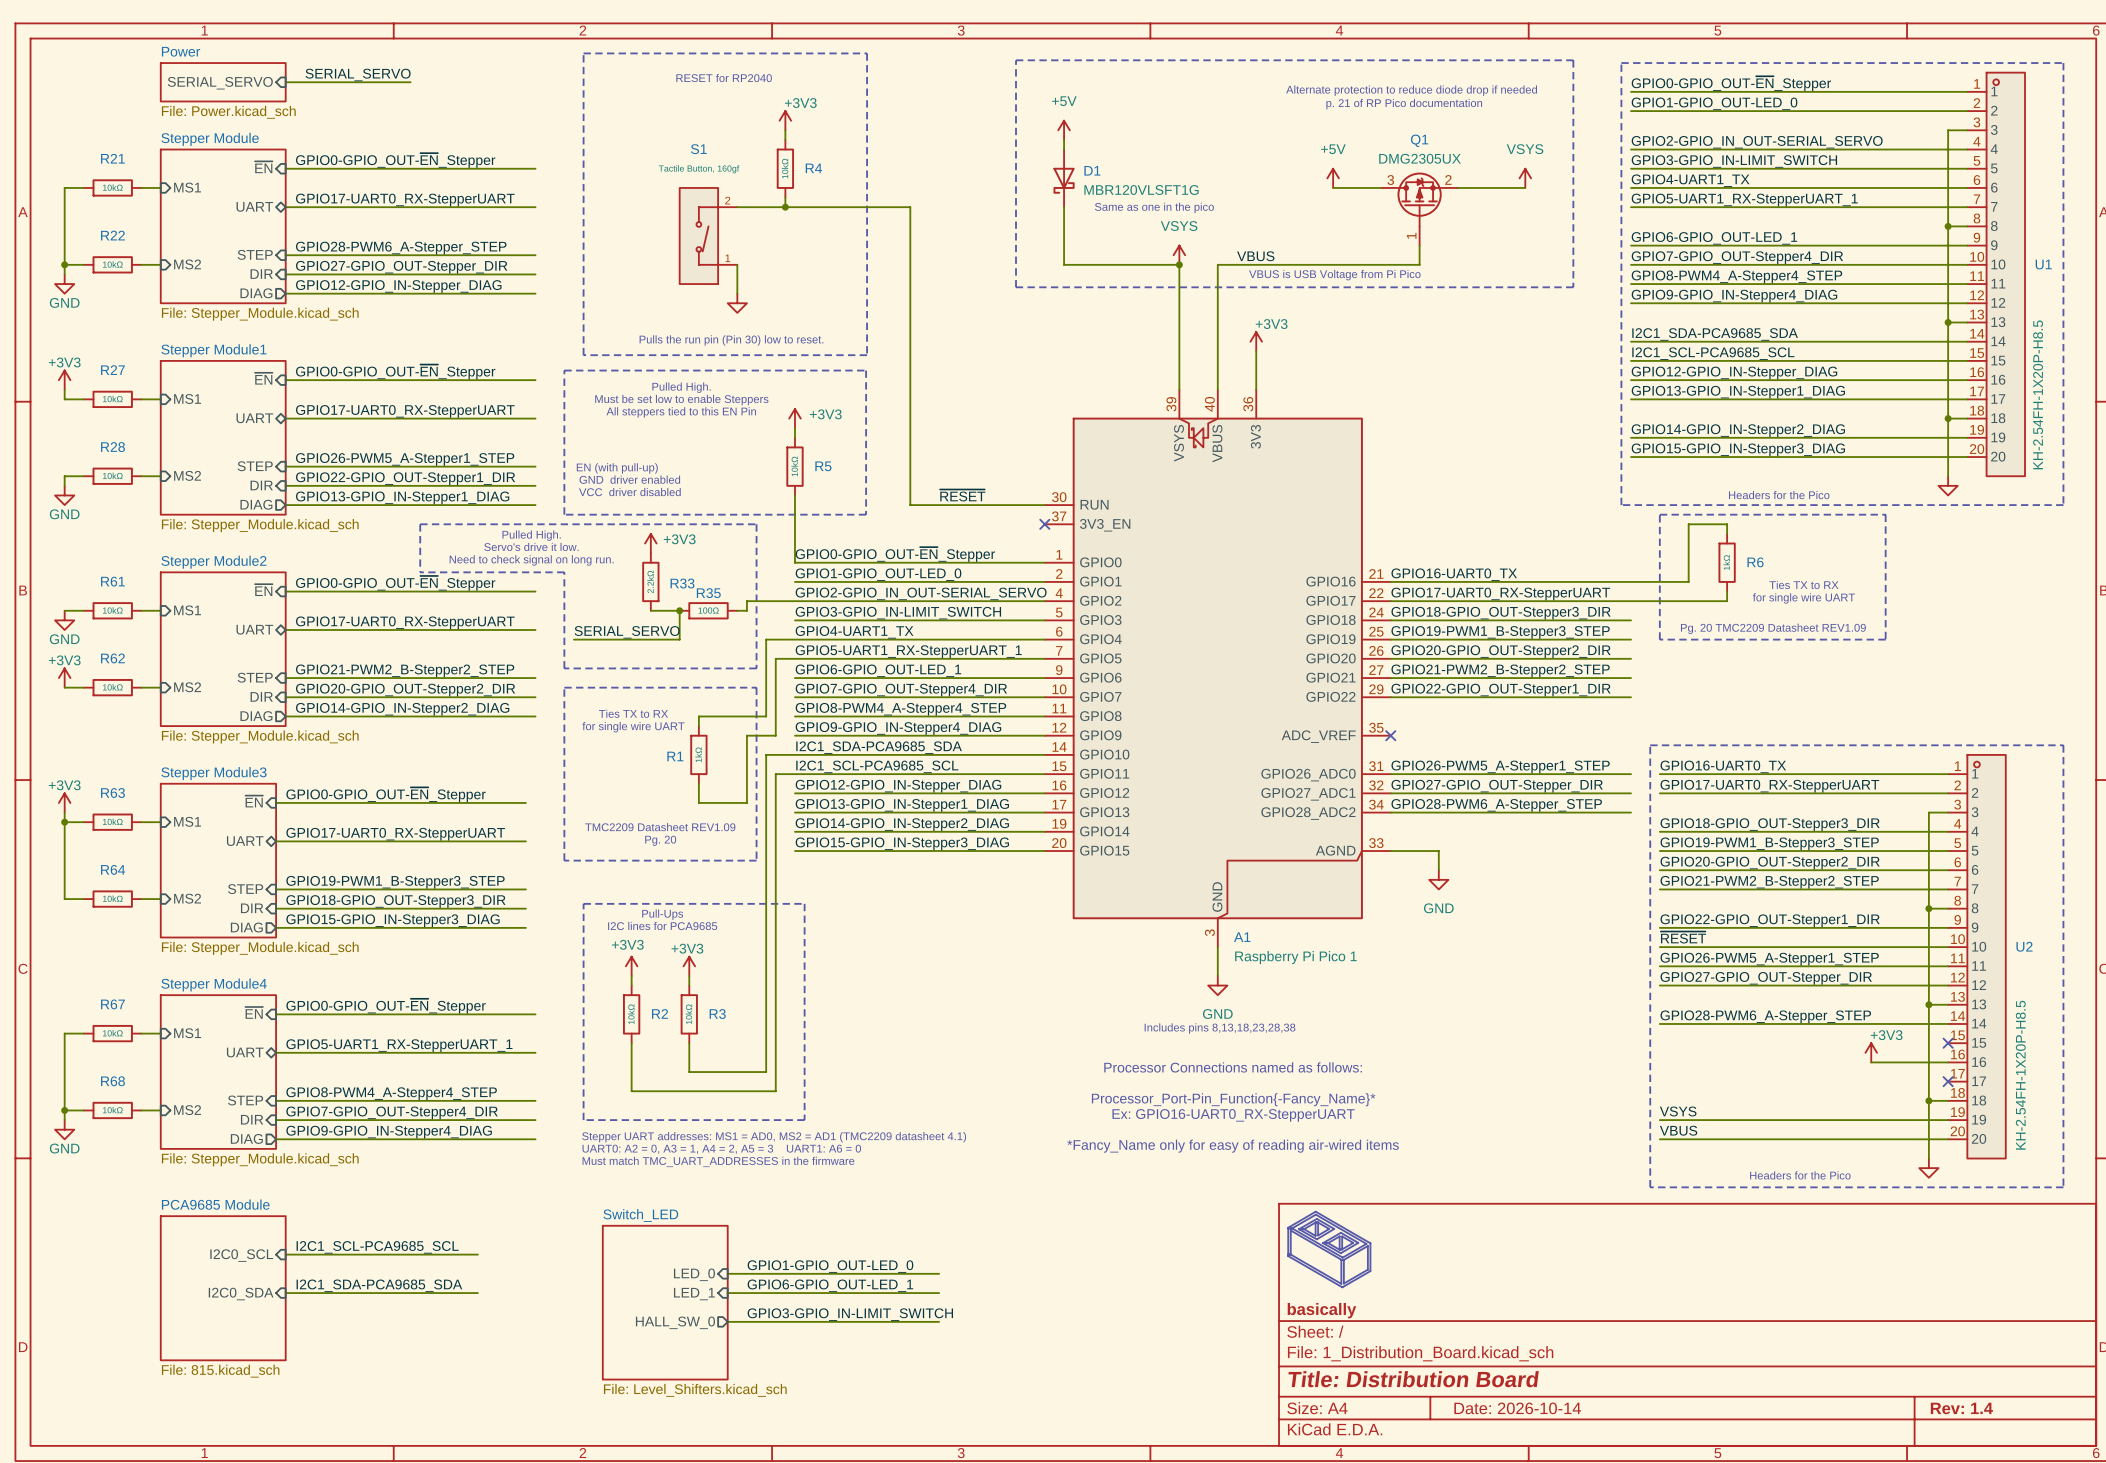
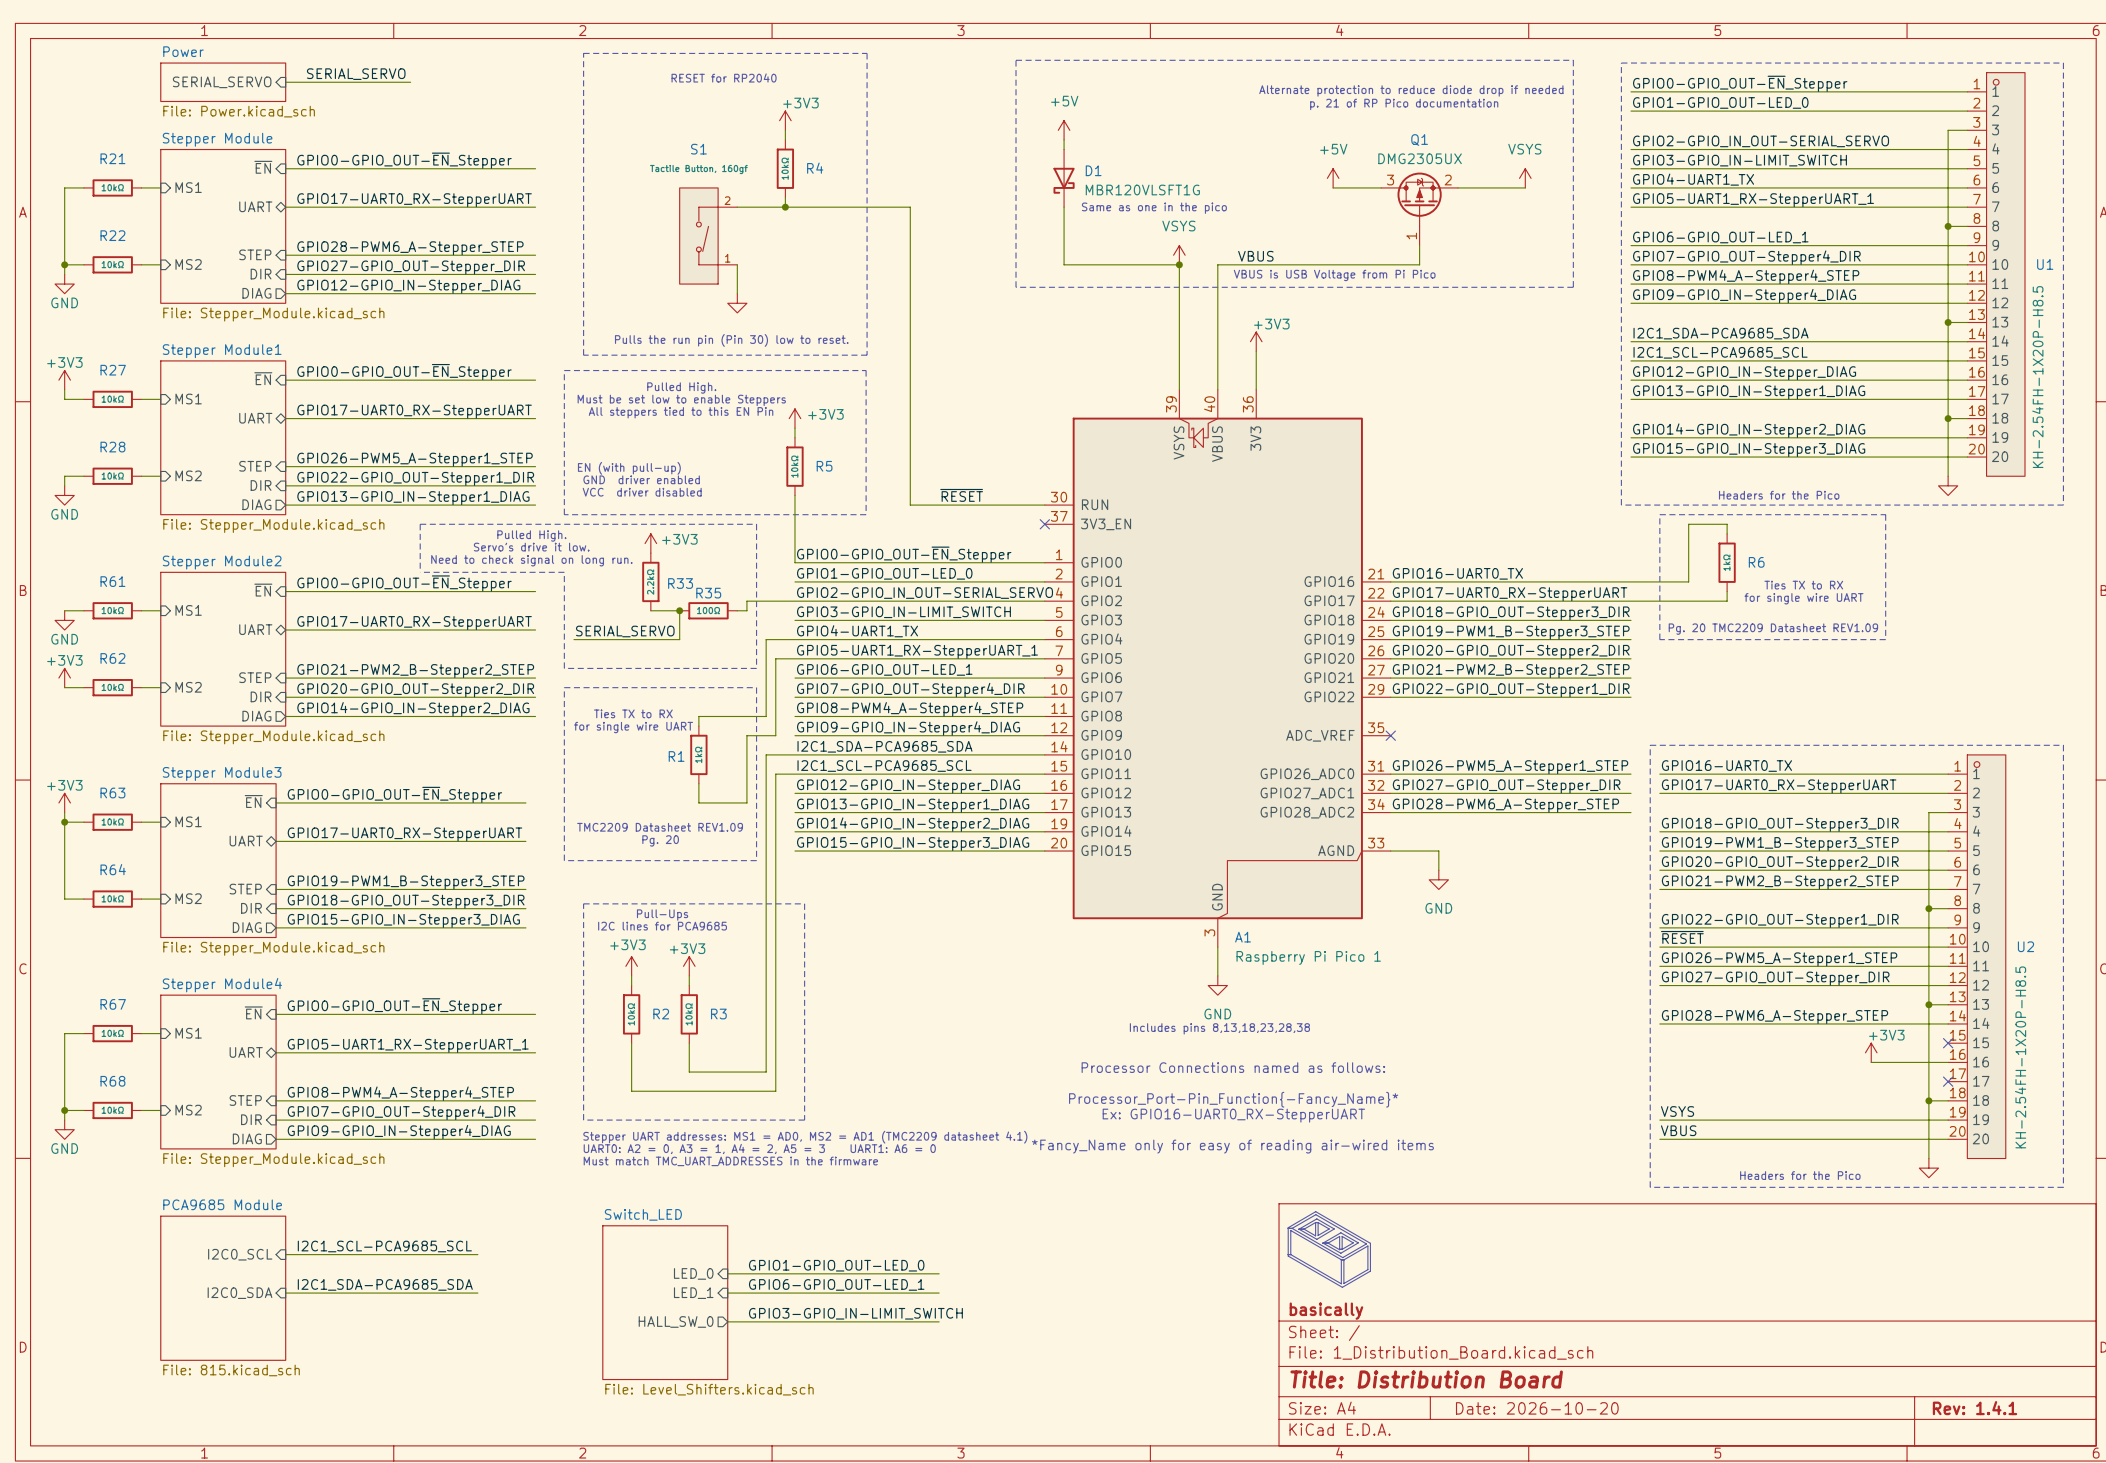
title block: Date: 2026-10-14 (1517, 1408) -> Date: 2026-10-20 (1537, 1408)
title block: Rev: 1.4 (1961, 1408) -> Rev: 1.4.1 (1975, 1408)

